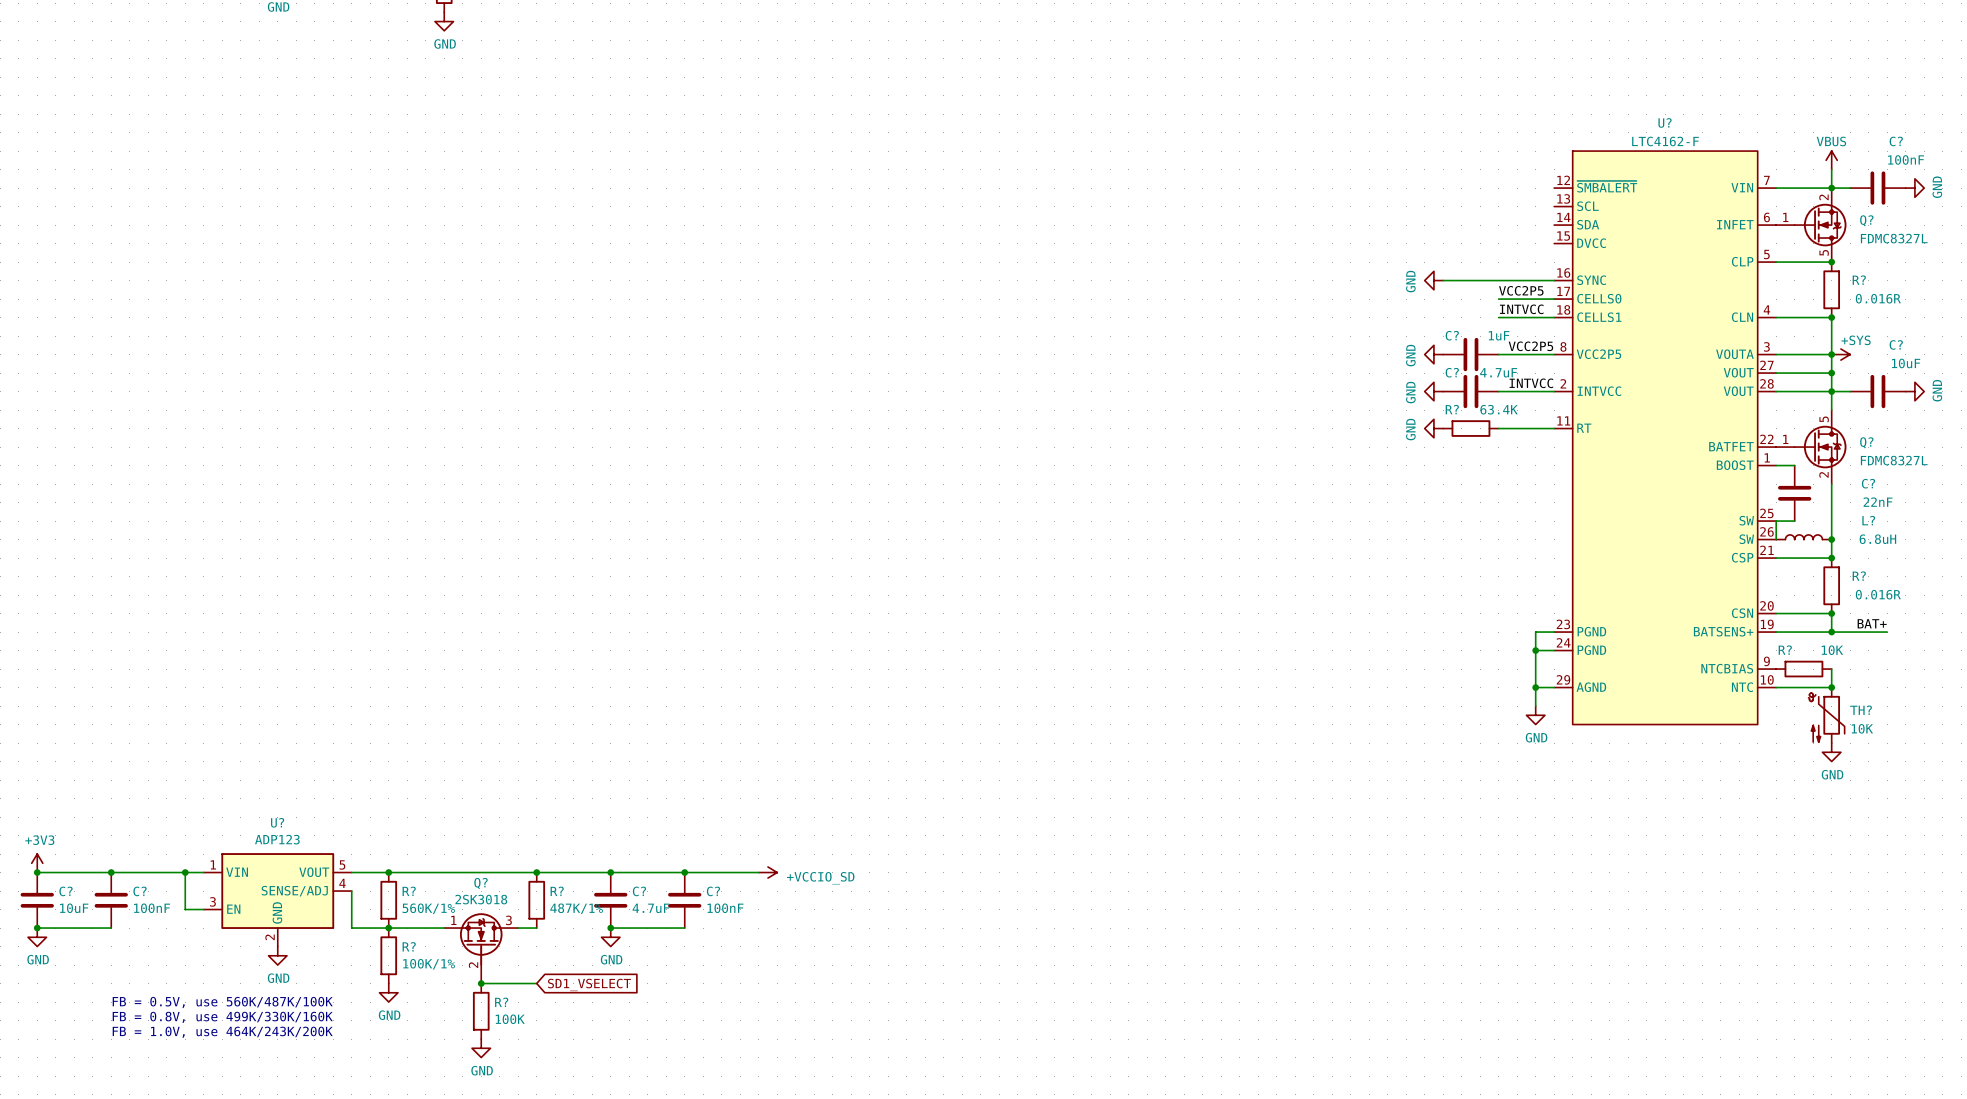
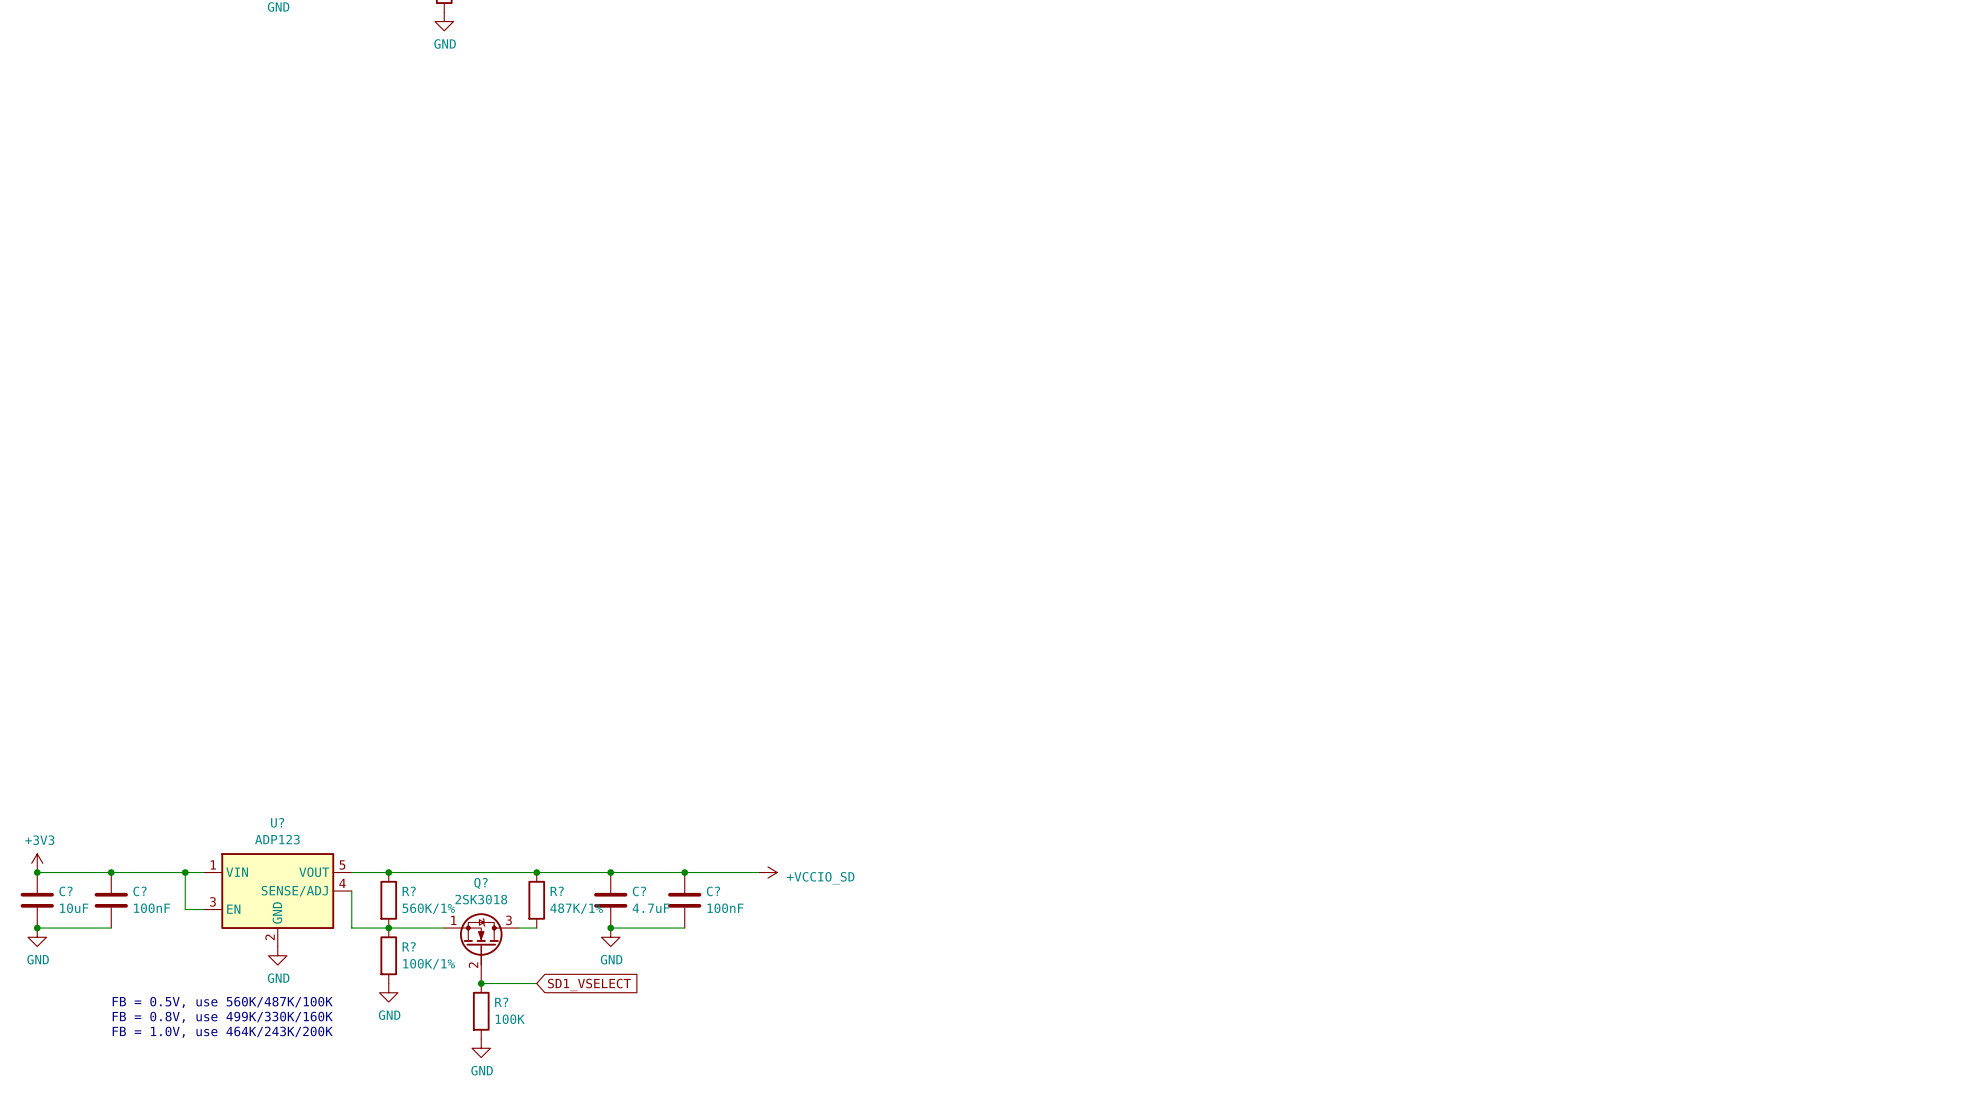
power symbol: VBUS (1831, 160) -> none
wire: (1831, 169) (1831, 188) -> none
wire: (1776, 188) (1850, 188) -> none
junction: (1831, 188) -> none
C?: 100nF (1877, 188) -> none
power symbol: GND (1914, 188) -> none
Q?: FDMC8327L (1811, 225) -> none
wire: (1776, 262) (1831, 262) -> none
junction: (1831, 262) -> none
power symbol: GND (1433, 280) -> none
wire: (1443, 280) (1554, 280) -> none
R?: 0.016R (1831, 289) -> none
label: VCC2P5 (1521, 290) -> none
wire: (1498, 299) (1554, 299) -> none
label: INTVCC (1521, 309) -> none
wire: (1498, 317) (1554, 317) -> none
wire: (1776, 317) (1831, 317) (1831, 410) -> none
junction: (1831, 317) -> none
label: VCC2P5 (1530, 346) -> none
power symbol: GND (1433, 354) -> none
C?: 1uF (1470, 354) -> none
wire: (1498, 354) (1554, 354) -> none
wire: (1776, 354) (1831, 354) -> none
junction: (1831, 354) -> none
power symbol: +SYS (1840, 354) -> none
wire: (1776, 373) (1831, 373) -> none
junction: (1831, 373) -> none
label: INTVCC (1531, 383) -> none
power symbol: GND (1433, 391) -> none
C?: 4.7uF (1470, 391) -> none
wire: (1498, 391) (1554, 391) -> none
wire: (1776, 391) (1850, 391) -> none
junction: (1831, 391) -> none
C?: 10uF (1877, 391) -> none
power symbol: GND (1914, 391) -> none
power symbol: GND (1433, 428) -> none
R?: 63.4K (1470, 428) -> none
wire: (1498, 428) (1554, 428) -> none
U?: LTC4162-F (1665, 437) -> none
Q?: FDMC8327L (1811, 447) -> none
wire: (1776, 465) (1794, 465) -> none
wire: (1831, 484) (1831, 558) (1776, 558) -> none
C?: 22nF (1794, 493) -> none
wire: (1794, 521) (1776, 521) (1776, 539) -> none
L?: 6.8uH (1803, 537) -> none
junction: (1831, 539) -> none
junction: (1831, 558) -> none
R?: 0.016R (1831, 585) -> none
wire: (1776, 613) (1831, 613) (1831, 632) -> none
junction: (1831, 613) -> none
label: BAT+ (1872, 623) -> none
wire: (1554, 632) (1535, 632) (1535, 706) -> none
wire: (1776, 632) (1887, 632) -> none
junction: (1831, 632) -> none
wire: (1535, 650) (1554, 650) -> none
junction: (1535, 650) -> none
R?: 10K (1803, 669) -> none
wire: (1831, 669) (1831, 687) (1776, 687) -> none
wire: (1535, 687) (1554, 687) -> none
junction: (1535, 687) -> none
junction: (1831, 687) -> none
power symbol: GND (1535, 715) -> none
TH?: 10K (1826, 715) -> none
power symbol: GND (1831, 752) -> none

